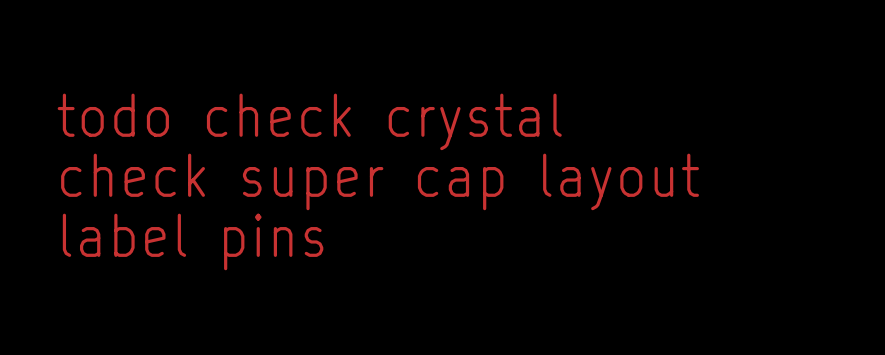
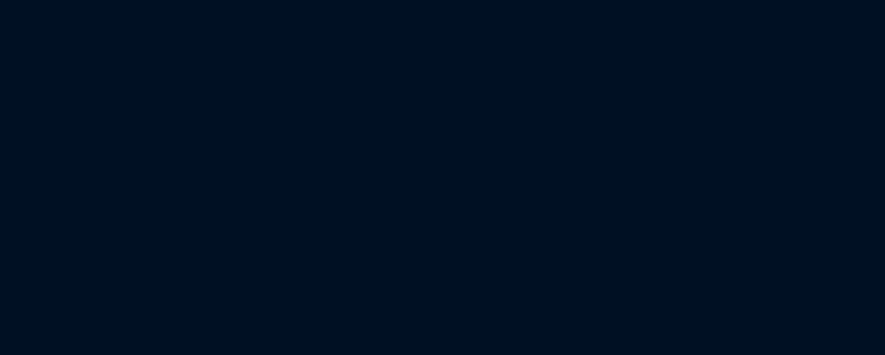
text: todo check crystal (309, 121) -> none
text: check super cap layout (380, 181) -> none
text: label pins (193, 241) -> none

